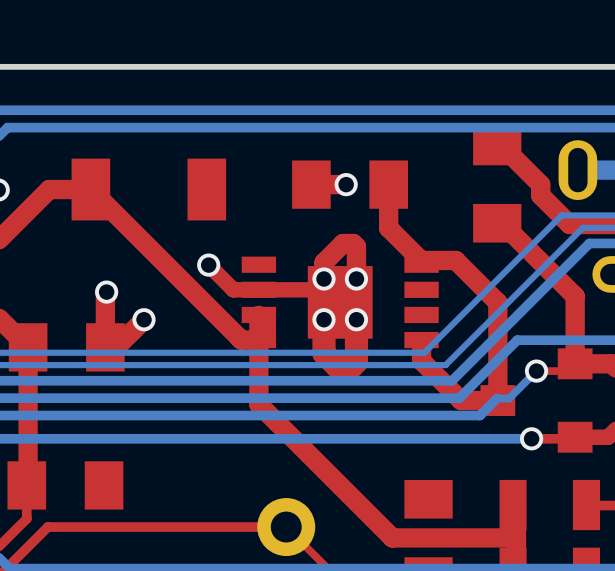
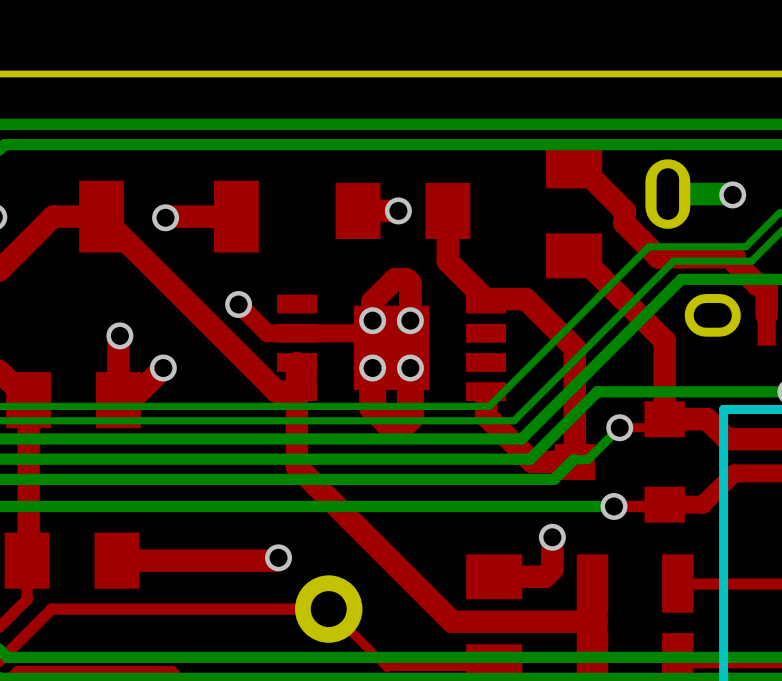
top track: none -> (236, 216) (165, 217)
via: none -> (165, 217)
top track: none -> (552, 537) (552, 569) (544, 576) (494, 576)
via: none -> (552, 537)
top track: none -> (278, 557) (275, 560) (116, 560)
via: none -> (278, 557)

